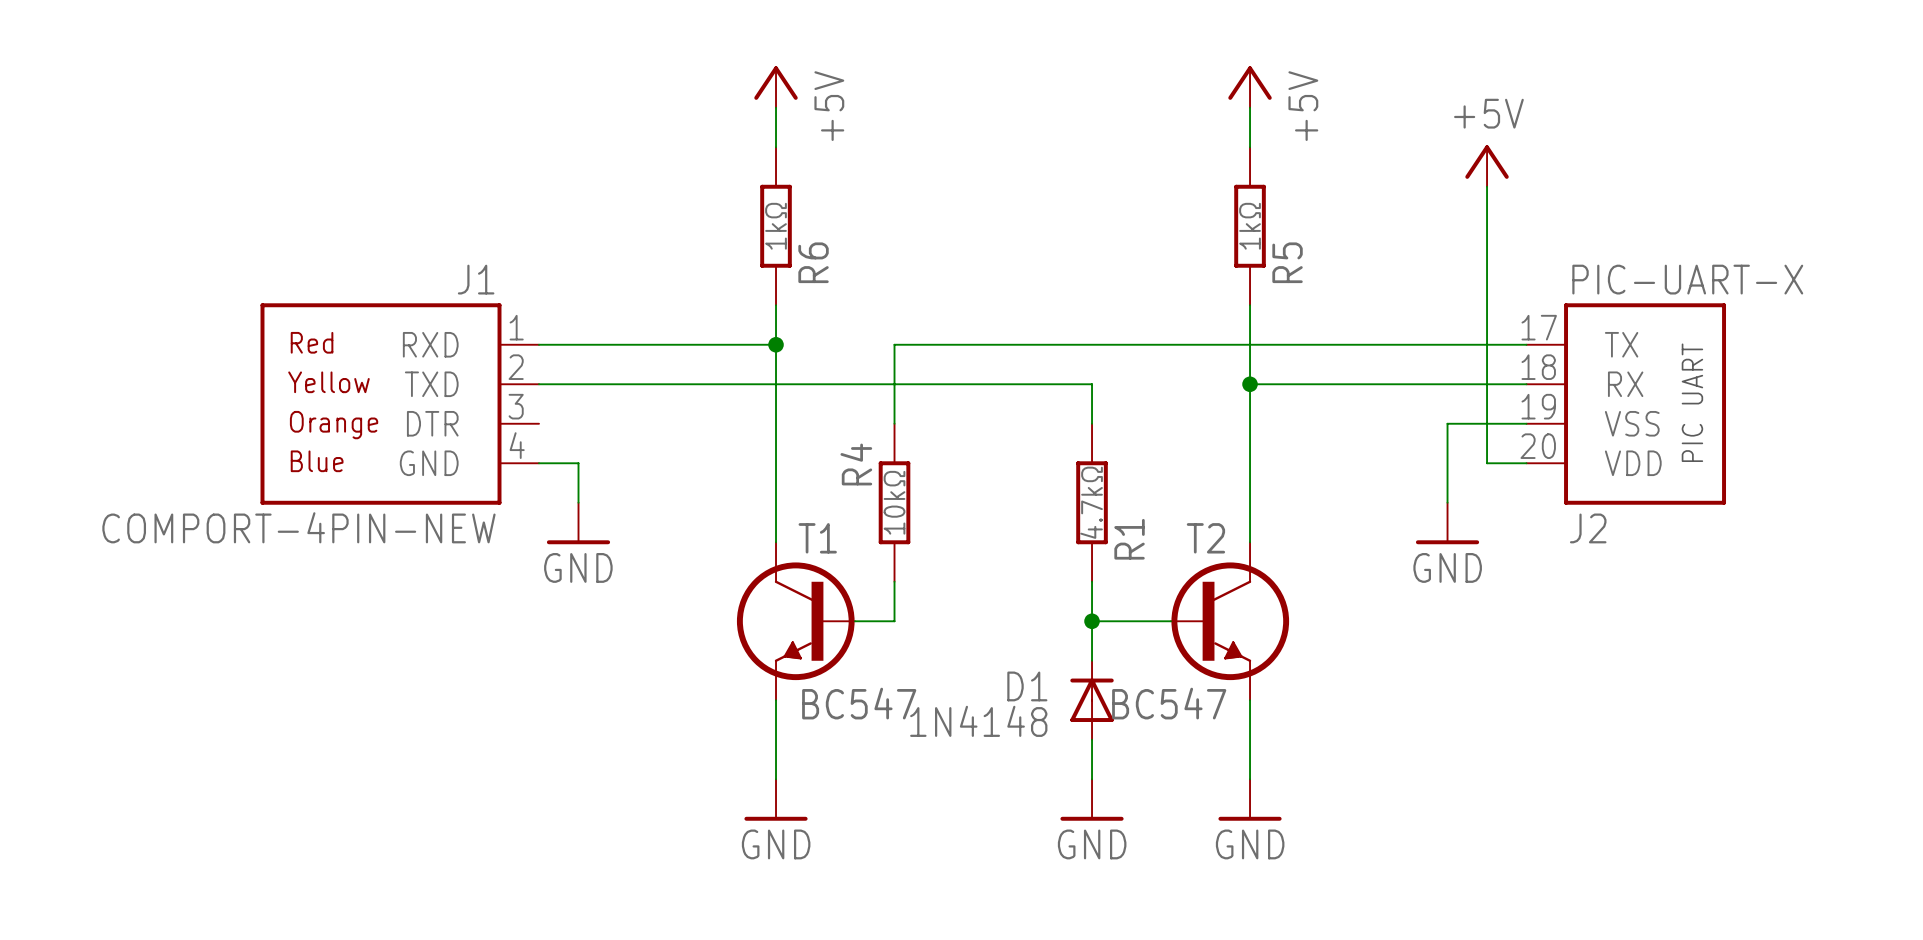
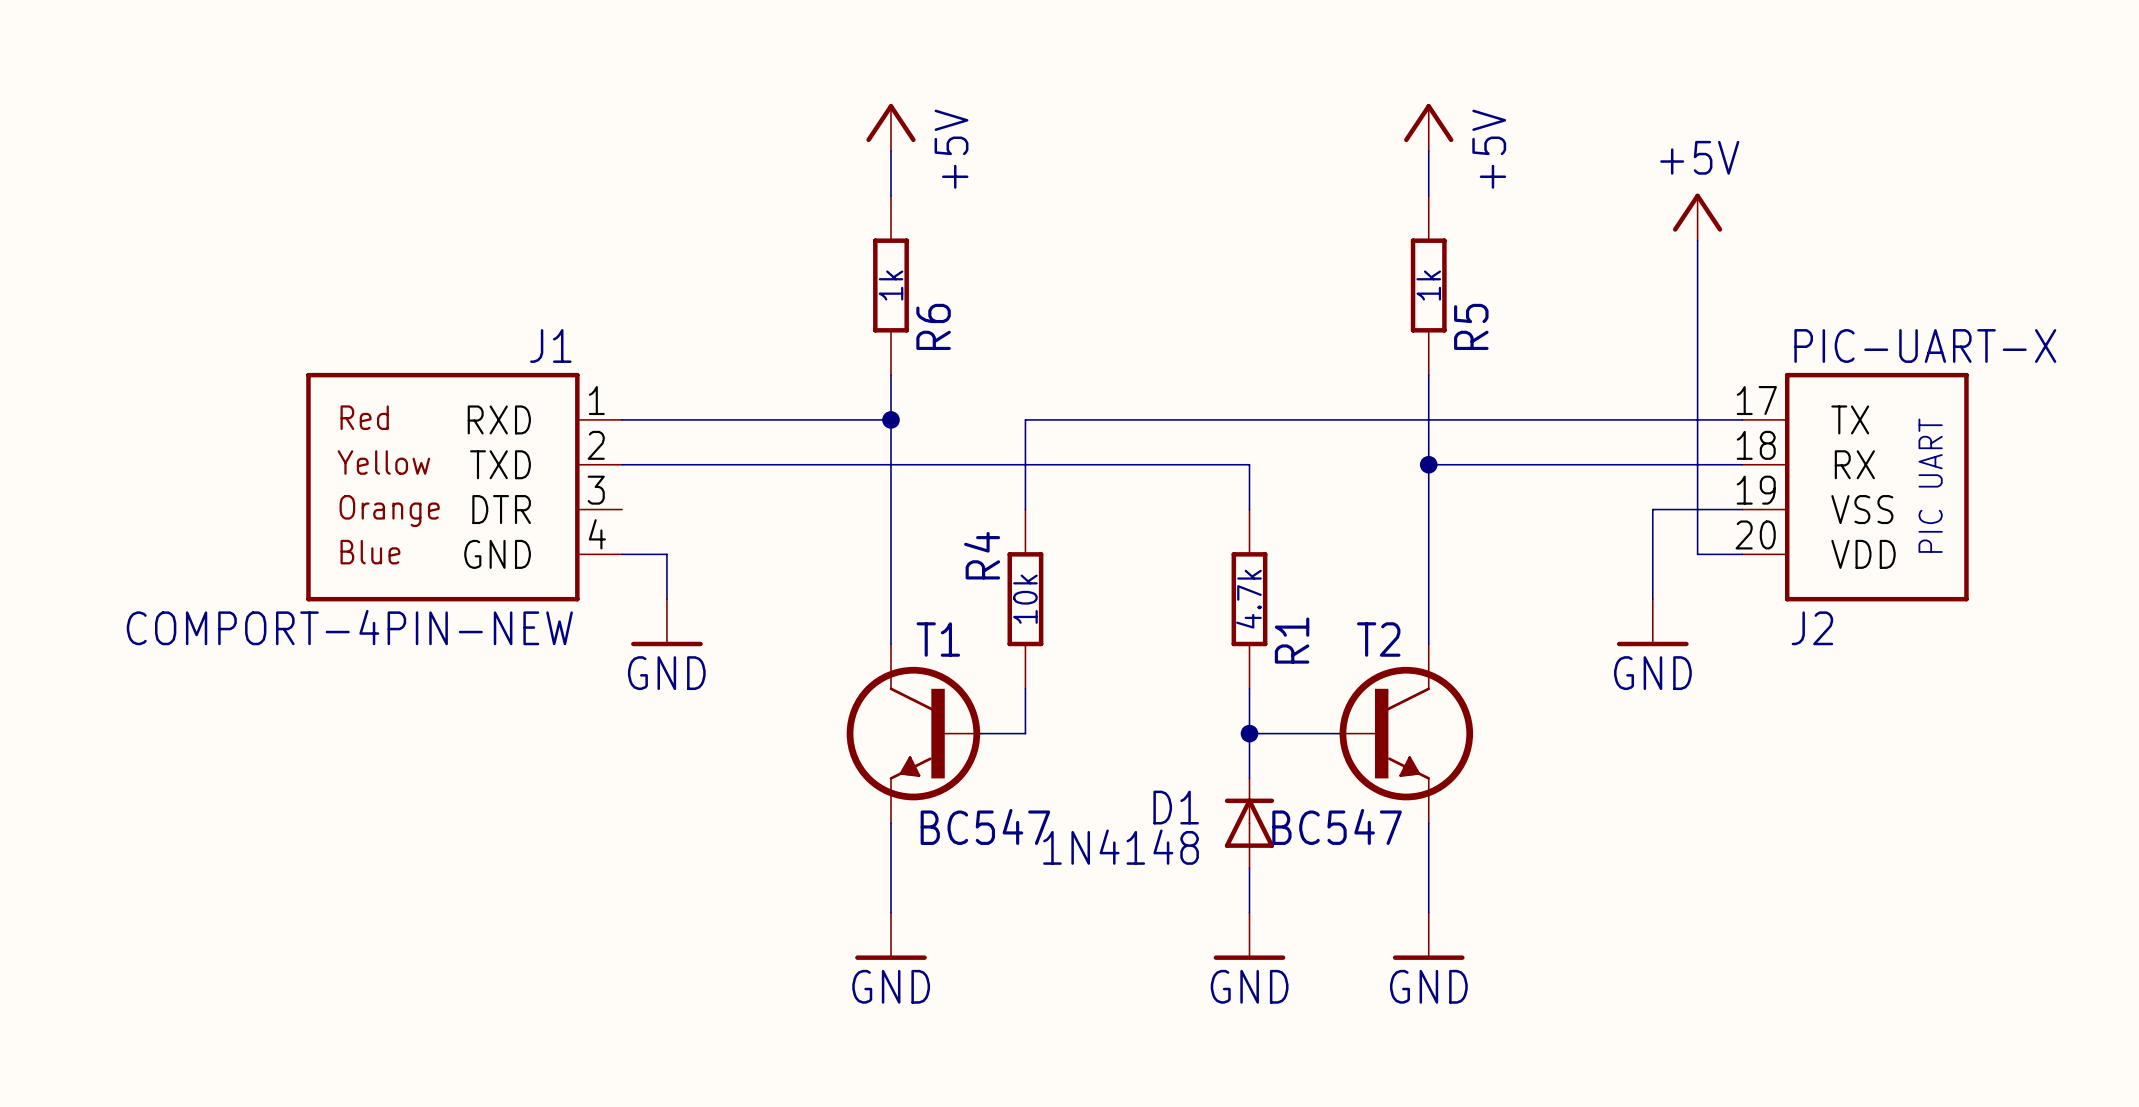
R6 value: 1kΩ (776, 226) -> 1k (891, 285)
R5 value: 1kΩ (1250, 226) -> 1k (1428, 285)
R4 value: 10kΩ (894, 502) -> 10k (1025, 599)
R1 value: 4.7kΩ (1091, 502) -> 4.7k (1248, 599)

